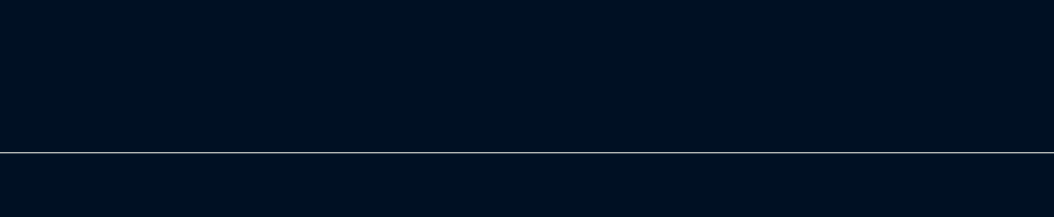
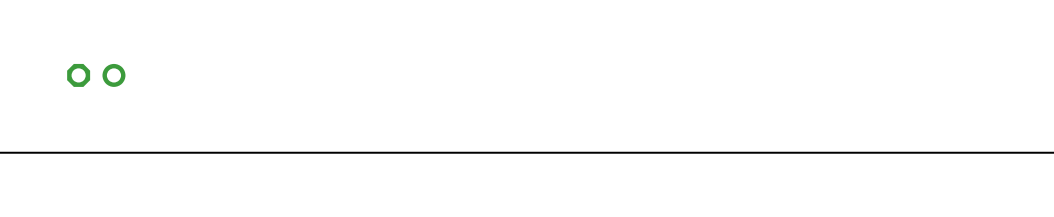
part: none -> (96, 75)

